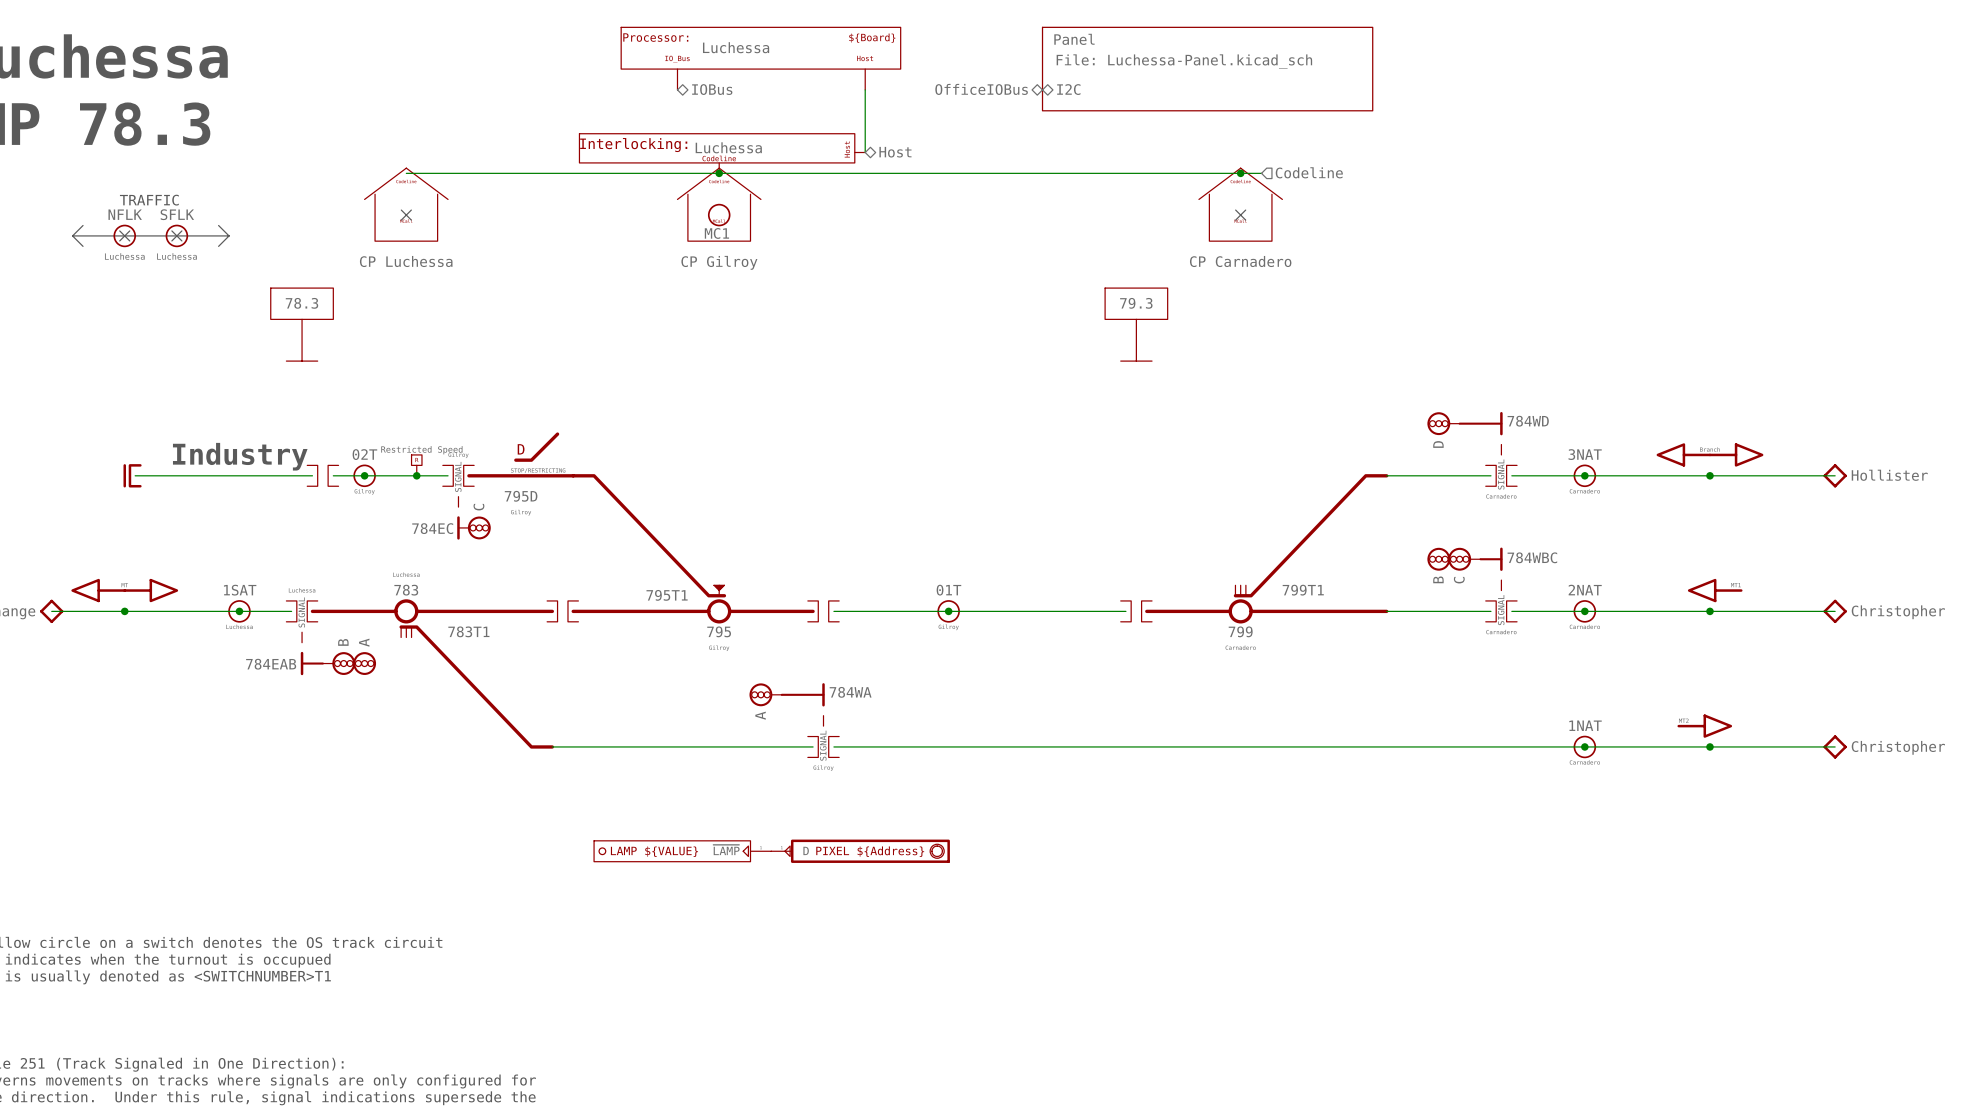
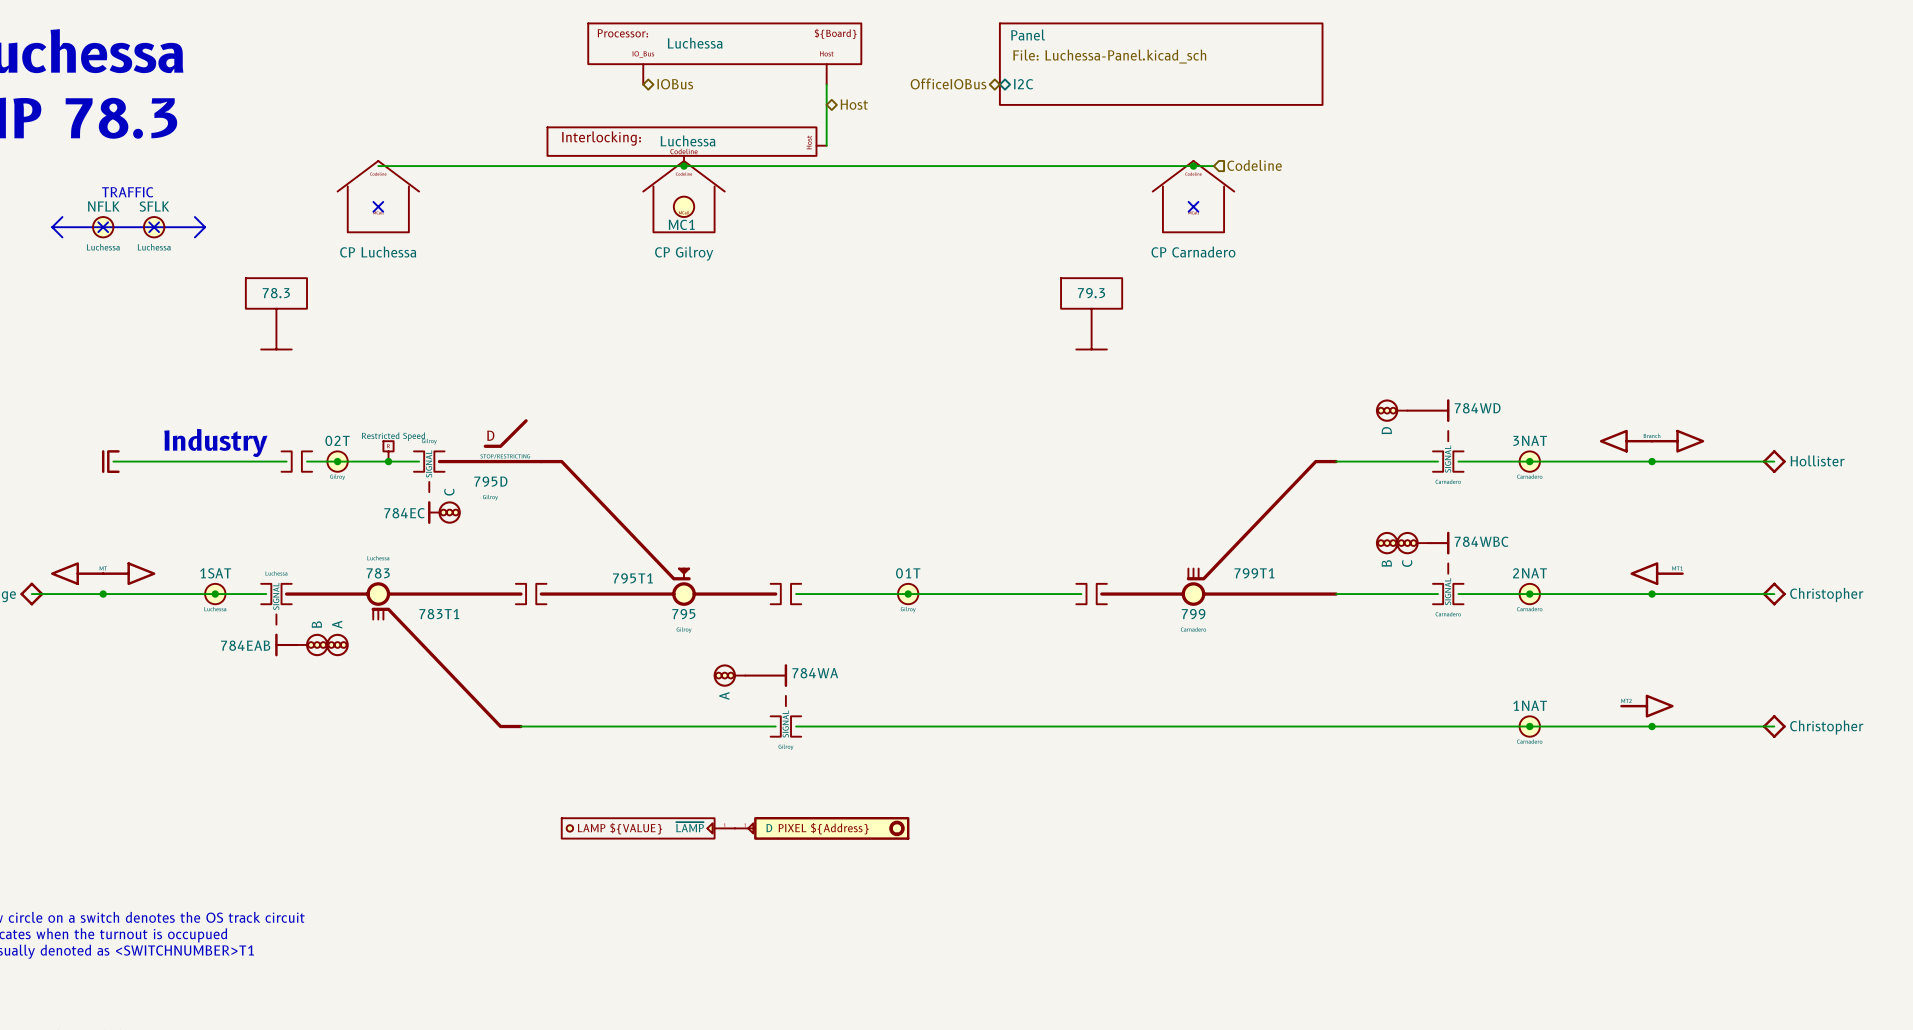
hierarchical label position: Host (895, 152) -> Host (854, 104)

